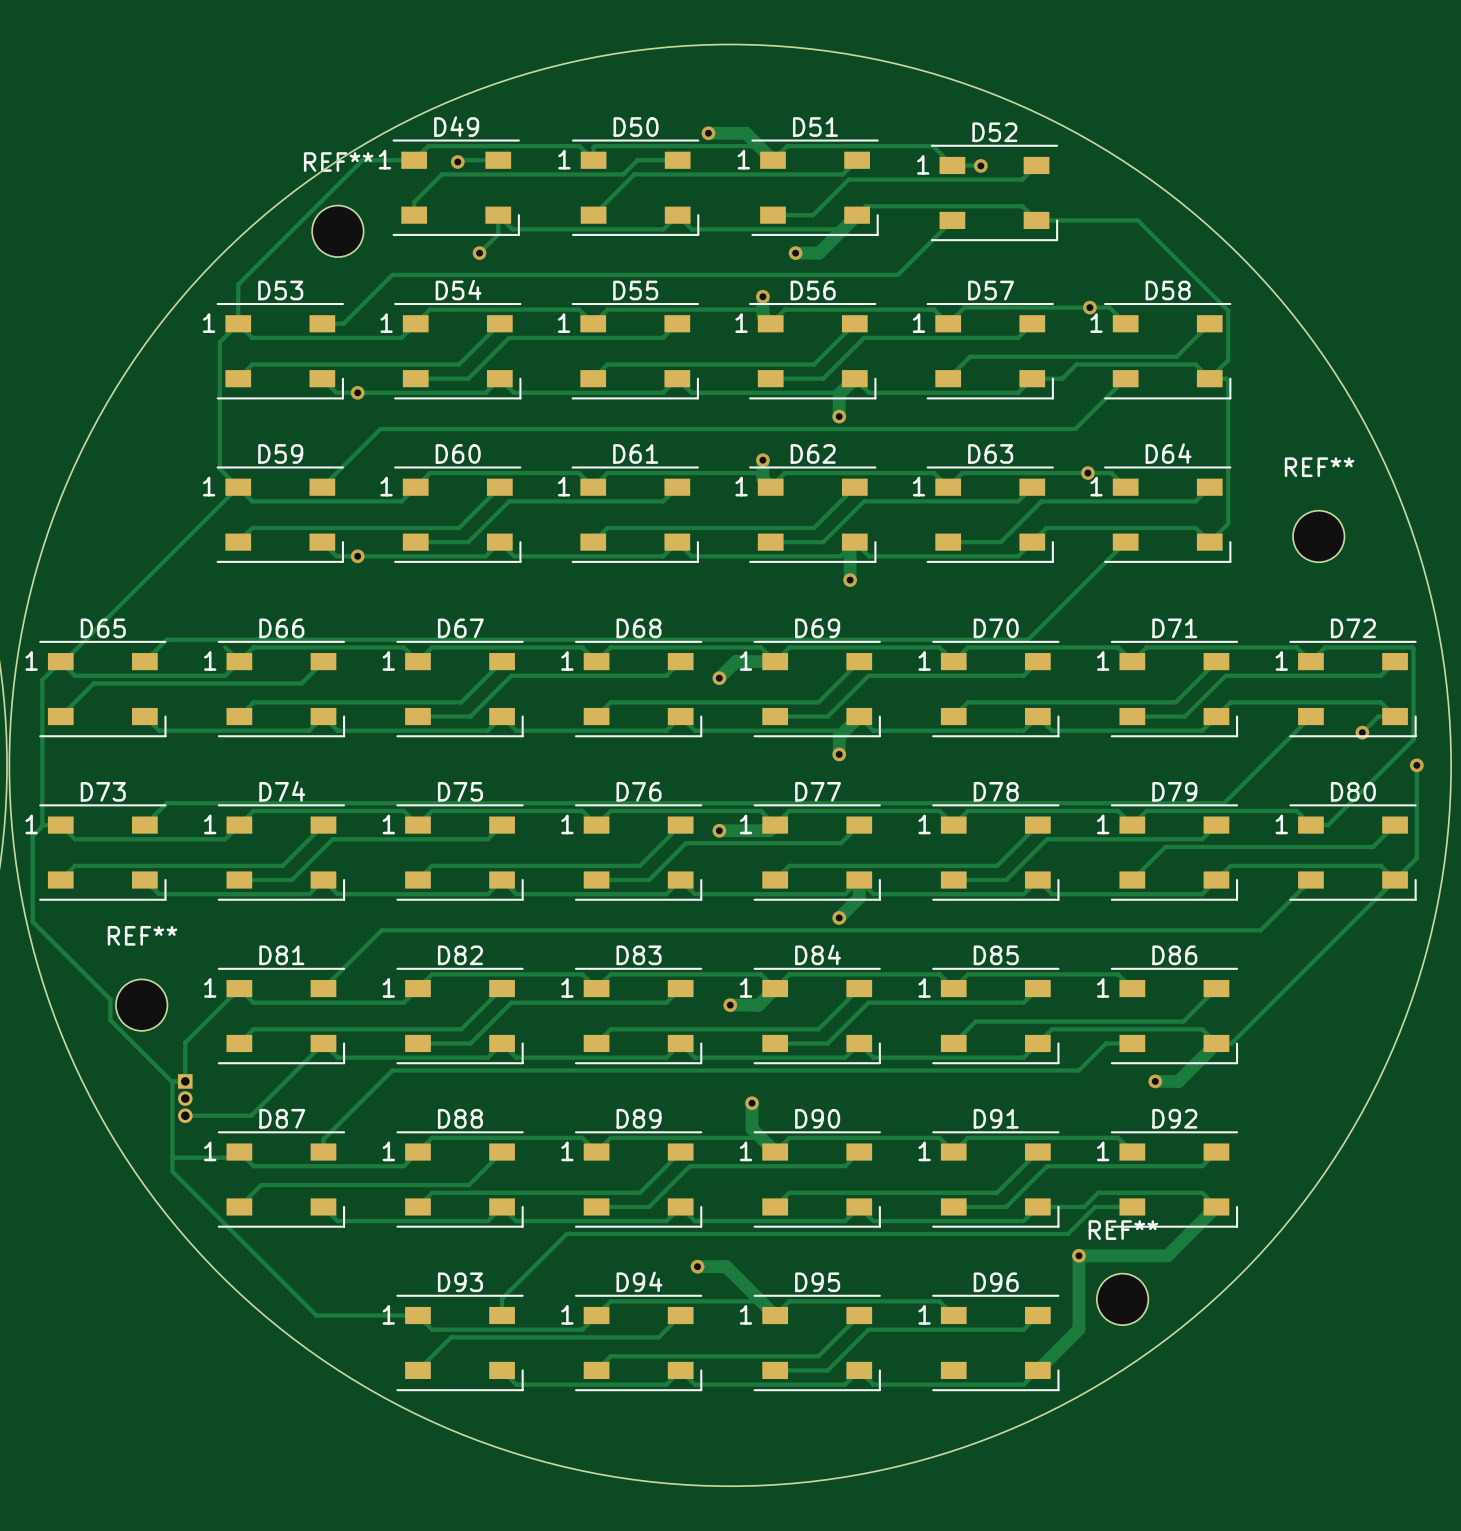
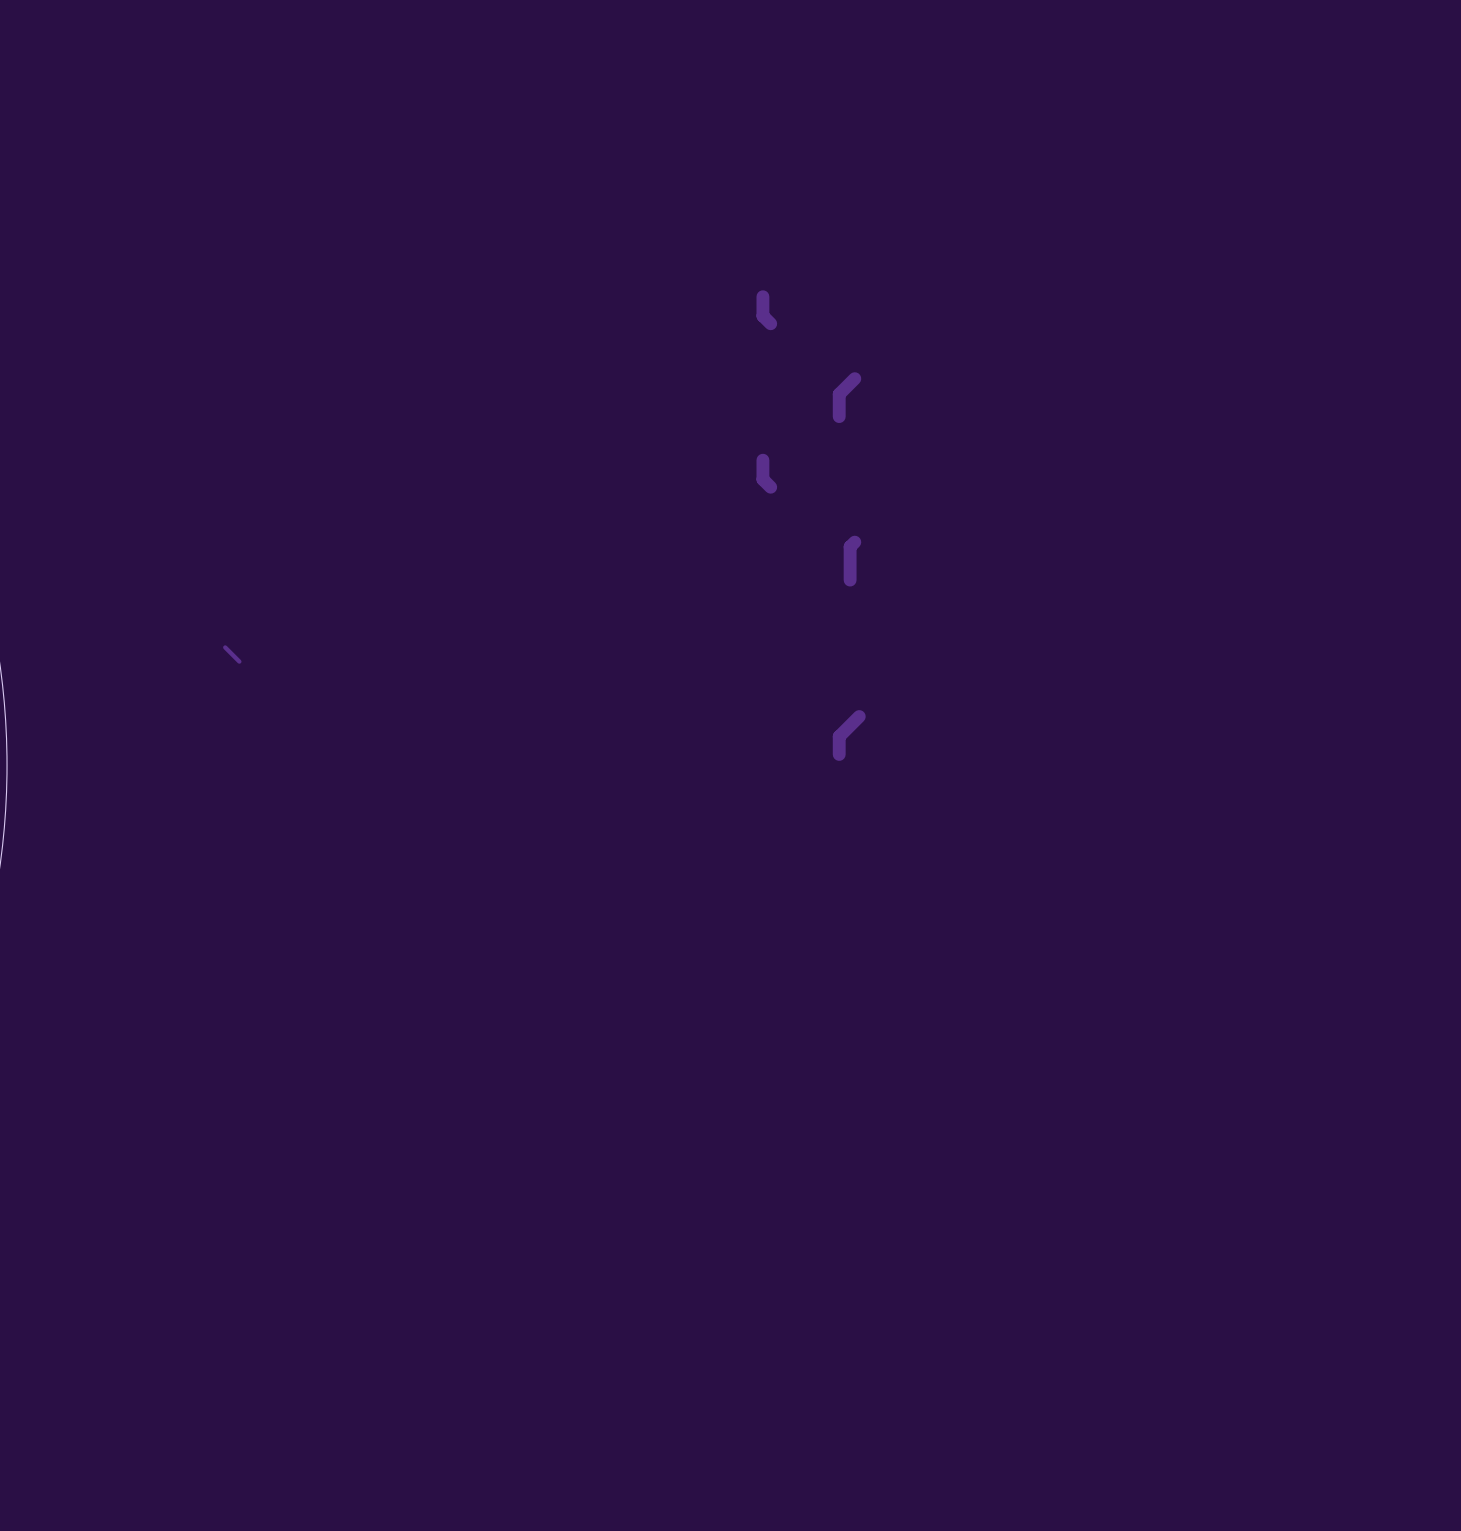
round board edge: [8, 44, 1452, 1487] -> none
track: (708, 133) (745, 133) (773, 160) -> none
via: (708, 133) -> none
track: (498, 160) (459, 160) (457, 161) -> none
track: (677, 160) (637, 160) (623, 174) (442, 174) (414, 202) (414, 215) -> none
track: (773, 160) (758, 146) (594, 146) (593, 160) (579, 146) (428, 146) (414, 160) (362, 160) (238, 284) (238, 323) -> none
track: (773, 160) (787, 146) (933, 146) (952, 165) (980, 165) -> none
track: (857, 160) (842, 174) (634, 174) (593, 215) -> none
via: (457, 161) -> none
via: (980, 165) -> none
track: (1036, 165) (1022, 179) (848, 179) (813, 215) (773, 215) -> none
D49: (456, 187) -> none
D50: (635, 187) -> none
D51: (815, 187) -> none
D52: (994, 192) -> none
track: (857, 215) (819, 253) (795, 253) -> none
track: (952, 220) (897, 274) (392, 274) (343, 323) (322, 323) (328, 329) -> none
REF**: (337, 231) -> none
track: (479, 253) (498, 234) (498, 215) (512, 229) (663, 229) (677, 215) (691, 229) (842, 229) (866, 206) (1022, 206) (1036, 220) (1137, 220) (1228, 310) (1228, 360) (1209, 378) -> none
via: (479, 253) -> none
via: (795, 253) -> none
via: (762, 296) -> none
via: (1089, 307) -> none
track: (238, 323) (219, 342) (219, 468) (252, 501) (401, 501) (429, 473) (579, 473) (593, 487) (607, 473) (756, 473) (770, 487) (784, 473) (934, 473) (948, 487) (962, 473) (1111, 473) (1125, 487) -> none
track: (238, 323) (252, 337) (401, 337) (429, 309) (579, 309) (593, 323) (607, 309) (756, 309) (770, 323) (784, 309) (934, 309) (948, 323) (964, 307) (1109, 307) (1125, 323) -> none
track: (499, 323) (459, 364) (252, 364) (238, 378) -> none
track: (677, 323) (663, 337) (509, 337) (468, 378) (415, 378) -> none
track: (854, 323) (814, 364) (607, 364) (593, 378) -> none
track: (1032, 323) (1018, 337) (864, 337) (823, 378) (770, 378) -> none
track: (1209, 323) (1176, 356) (970, 356) (948, 378) -> none
D53: (280, 351) -> none
D54: (457, 351) -> none
D55: (635, 351) -> none
D56: (812, 351) -> none
D57: (990, 351) -> none
D58: (1167, 351) -> none
track: (322, 378) (336, 392) (485, 392) (499, 378) (513, 392) (663, 392) (677, 378) (691, 392) (840, 392) (854, 378) (868, 392) (1018, 392) (1032, 378) (1062, 378) (1076, 364) (1195, 364) (1209, 378) -> none
track: (1125, 378) (1075, 429) (380, 429) (322, 487) -> none
track: (1209, 378) (1226, 378) (1228, 380) (1228, 523) (1209, 542) (1195, 527) (1046, 527) (1018, 556) (868, 556) (854, 542) (840, 556) (691, 556) (677, 542) (663, 556) (513, 556) (499, 542) (485, 556) (336, 556) (322, 542) -> none
via: (357, 392) -> none
via: (839, 416) -> none
via: (762, 460) -> none
via: (1087, 473) -> none
track: (238, 487) (63, 661) (60, 661) -> none
track: (499, 487) (459, 527) (252, 527) (238, 542) -> none
track: (677, 487) (663, 501) (509, 501) (468, 542) (415, 542) -> none
track: (854, 487) (814, 527) (607, 527) (593, 542) -> none
track: (1032, 487) (1018, 501) (864, 501) (823, 542) (770, 542) -> none
track: (1209, 487) (1195, 501) (1041, 501) (1000, 542) (948, 542) -> none
D59: (280, 514) -> none
D60: (457, 514) -> none
D61: (635, 514) -> none
D62: (812, 514) -> none
D63: (990, 514) -> none
D64: (1167, 514) -> none
REF**: (1318, 536) -> none
track: (1125, 542) (1028, 639) (166, 639) (144, 661) (147, 661) -> none
via: (357, 556) -> none
via: (850, 580) -> none
track: (60, 661) (42, 680) (43, 825) -> none
track: (60, 661) (74, 675) (225, 675) (253, 647) (403, 647) (417, 661) (432, 647) (582, 647) (596, 661) (610, 647) (761, 647) (775, 661) -> none
track: (323, 661) (301, 683) (93, 683) (60, 716) -> none
track: (502, 661) (461, 702) (253, 702) (239, 716) -> none
track: (680, 661) (666, 675) (511, 675) (470, 716) (417, 716) -> none
track: (775, 661) (789, 647) (939, 647) (953, 661) (967, 647) (1118, 647) (1132, 661) (1146, 647) (1296, 647) (1310, 661) (1325, 647) (1413, 648) (1413, 739) (1328, 825) (1310, 825) (1296, 810) (1146, 810) (1132, 825) (1118, 810) (967, 810) (953, 825) (939, 810) (789, 810) (775, 825) -> none
track: (775, 661) (735, 661) (719, 678) -> none
track: (859, 661) (818, 702) (610, 702) (596, 716) -> none
track: (1037, 661) (1023, 675) (868, 675) (827, 716) (775, 716) -> none
track: (1216, 661) (1175, 702) (967, 702) (953, 716) -> none
track: (1395, 661) (1380, 675) (1225, 675) (1184, 716) (1132, 716) -> none
via: (719, 678) -> none
D65: (102, 689) -> none
D66: (281, 689) -> none
D67: (460, 689) -> none
D68: (638, 689) -> none
D69: (817, 689) -> none
D70: (995, 689) -> none
D71: (1174, 689) -> none
D72: (1353, 689) -> none
track: (144, 716) (159, 730) (309, 730) (323, 716) (337, 730) (487, 730) (502, 716) (516, 730) (666, 730) (680, 716) (694, 730) (845, 730) (859, 716) (873, 730) (1023, 730) (1037, 716) (1052, 730) (1202, 730) (1230, 702) (1380, 702) (1395, 716) (1378, 716) (1362, 732) -> none
track: (1310, 716) (1224, 803) (166, 803) (144, 825) -> none
via: (1362, 732) -> none
via: (839, 754) -> none
track: (1416, 765) (1416, 858) (1231, 1043) (1216, 1043) -> none
via: (1416, 765) -> none
track: (43, 825) (32, 835) (32, 921) (110, 999) (110, 1020) (171, 1081) (185, 1081) (185, 1042) (239, 988) (253, 1002) (403, 1002) (432, 974) (582, 974) (596, 988) (610, 974) (761, 974) (775, 988) -> none
track: (43, 825) (60, 825) (74, 839) (225, 839) (253, 810) (403, 810) (417, 825) (432, 810) (582, 810) (596, 825) (610, 810) (761, 810) (775, 825) -> none
track: (323, 825) (282, 865) (74, 865) (60, 880) -> none
track: (502, 825) (487, 839) (332, 839) (291, 880) (239, 880) -> none
track: (680, 825) (639, 865) (432, 865) (417, 880) -> none
track: (775, 825) (769, 830) (719, 830) -> none
track: (859, 825) (841, 843) (685, 843) (649, 880) (596, 880) -> none
track: (1037, 825) (997, 865) (789, 865) (775, 880) -> none
track: (1216, 825) (1202, 839) (1047, 839) (1006, 880) (953, 880) -> none
track: (1395, 825) (1373, 846) (1165, 846) (1132, 880) -> none
via: (719, 830) -> none
D73: (102, 852) -> none
D74: (281, 852) -> none
D75: (460, 852) -> none
D76: (638, 852) -> none
D77: (817, 852) -> none
D78: (995, 852) -> none
D79: (1174, 852) -> none
D80: (1353, 852) -> none
track: (144, 880) (159, 894) (309, 894) (323, 880) (337, 894) (487, 894) (502, 880) (516, 894) (666, 894) (680, 880) (694, 894) (845, 894) (859, 880) -> none
track: (859, 880) (873, 894) (1023, 894) (1037, 880) (1052, 894) (1202, 894) (1230, 865) (1380, 865) (1395, 880) -> none
track: (859, 880) (859, 897) (839, 917) -> none
track: (1310, 880) (1260, 930) (381, 930) (323, 988) -> none
via: (839, 917) -> none
track: (502, 988) (461, 1029) (253, 1029) (239, 1043) -> none
track: (680, 988) (666, 1002) (511, 1002) (470, 1043) (417, 1043) -> none
track: (775, 988) (789, 974) (939, 974) (953, 988) (967, 974) (1118, 974) (1132, 988) -> none
track: (775, 988) (758, 1005) (730, 1005) -> none
track: (859, 988) (818, 1029) (610, 1029) (596, 1043) -> none
track: (1037, 988) (1023, 1002) (868, 1002) (827, 1043) (775, 1043) -> none
track: (1216, 988) (1183, 1021) (975, 1021) (953, 1043) -> none
REF**: (141, 1005) -> none
via: (730, 1005) -> none
D81: (281, 1016) -> none
D82: (460, 1016) -> none
D83: (638, 1016) -> none
D84: (817, 1016) -> none
D85: (995, 1016) -> none
D86: (1174, 1016) -> none
track: (1132, 1043) (1106, 1043) (1078, 1070) (392, 1070) (323, 1139) (323, 1152) (328, 1146) -> none
track: (1216, 1043) (1202, 1029) (1052, 1029) (1023, 1057) (873, 1057) (859, 1043) (845, 1057) (694, 1057) (680, 1043) (666, 1057) (516, 1057) (502, 1043) (487, 1057) (337, 1057) (323, 1043) (251, 1115) (185, 1115) -> none
track: (1216, 1043) (1178, 1081) (1155, 1081) -> none
track: (173, 1081) (172, 1171) (316, 1315) (417, 1315) (432, 1329) (582, 1329) (610, 1301) (761, 1301) (775, 1315) -> none
via: (1155, 1081) -> none
part: (185, 1098) -> none
track: (752, 1103) (752, 1128) (775, 1152) -> none
via: (752, 1103) -> none
track: (502, 1152) (469, 1185) (261, 1185) (239, 1206) -> none
track: (680, 1152) (639, 1192) (432, 1192) (417, 1206) -> none
track: (775, 1152) (761, 1137) (610, 1137) (596, 1152) (582, 1137) (432, 1137) (403, 1166) (253, 1166) (239, 1152) (233, 1157) (174, 1157) (172, 1155) -> none
track: (775, 1152) (789, 1137) (939, 1137) (953, 1152) (967, 1137) (1118, 1137) (1132, 1152) -> none
track: (859, 1152) (845, 1166) (689, 1166) (649, 1206) (596, 1206) -> none
track: (1037, 1152) (997, 1192) (789, 1192) (775, 1206) -> none
track: (1216, 1152) (1202, 1166) (1047, 1166) (1006, 1206) (953, 1206) -> none
D87: (281, 1179) -> none
D88: (460, 1179) -> none
D89: (638, 1179) -> none
D90: (817, 1179) -> none
D91: (995, 1179) -> none
D92: (1174, 1179) -> none
track: (323, 1206) (337, 1221) (487, 1221) (502, 1206) (516, 1221) (666, 1221) (680, 1206) (694, 1221) (845, 1221) (859, 1206) (873, 1221) (1023, 1221) (1037, 1206) (1084, 1206) (1098, 1192) (1202, 1192) (1216, 1206) (1167, 1255) (1078, 1255) (1078, 1329) (1023, 1384) (873, 1384) (859, 1370) (845, 1384) (694, 1384) (680, 1370) (666, 1384) (516, 1384) (502, 1370) -> none
track: (1132, 1206) (1095, 1206) (1068, 1233) (566, 1233) (502, 1298) (502, 1315) -> none
via: (1078, 1255) -> none
track: (697, 1266) (726, 1266) (775, 1315) -> none
via: (697, 1266) -> none
REF**: (1122, 1299) -> none
track: (680, 1315) (658, 1337) (451, 1337) (417, 1370) -> none
track: (775, 1315) (789, 1301) (939, 1301) (953, 1315) -> none
track: (859, 1315) (818, 1356) (610, 1356) (596, 1370) -> none
track: (1037, 1315) (1023, 1329) (868, 1329) (827, 1370) (775, 1370) -> none
D93: (460, 1342) -> none
D94: (638, 1342) -> none
D95: (817, 1342) -> none
D96: (995, 1342) -> none

